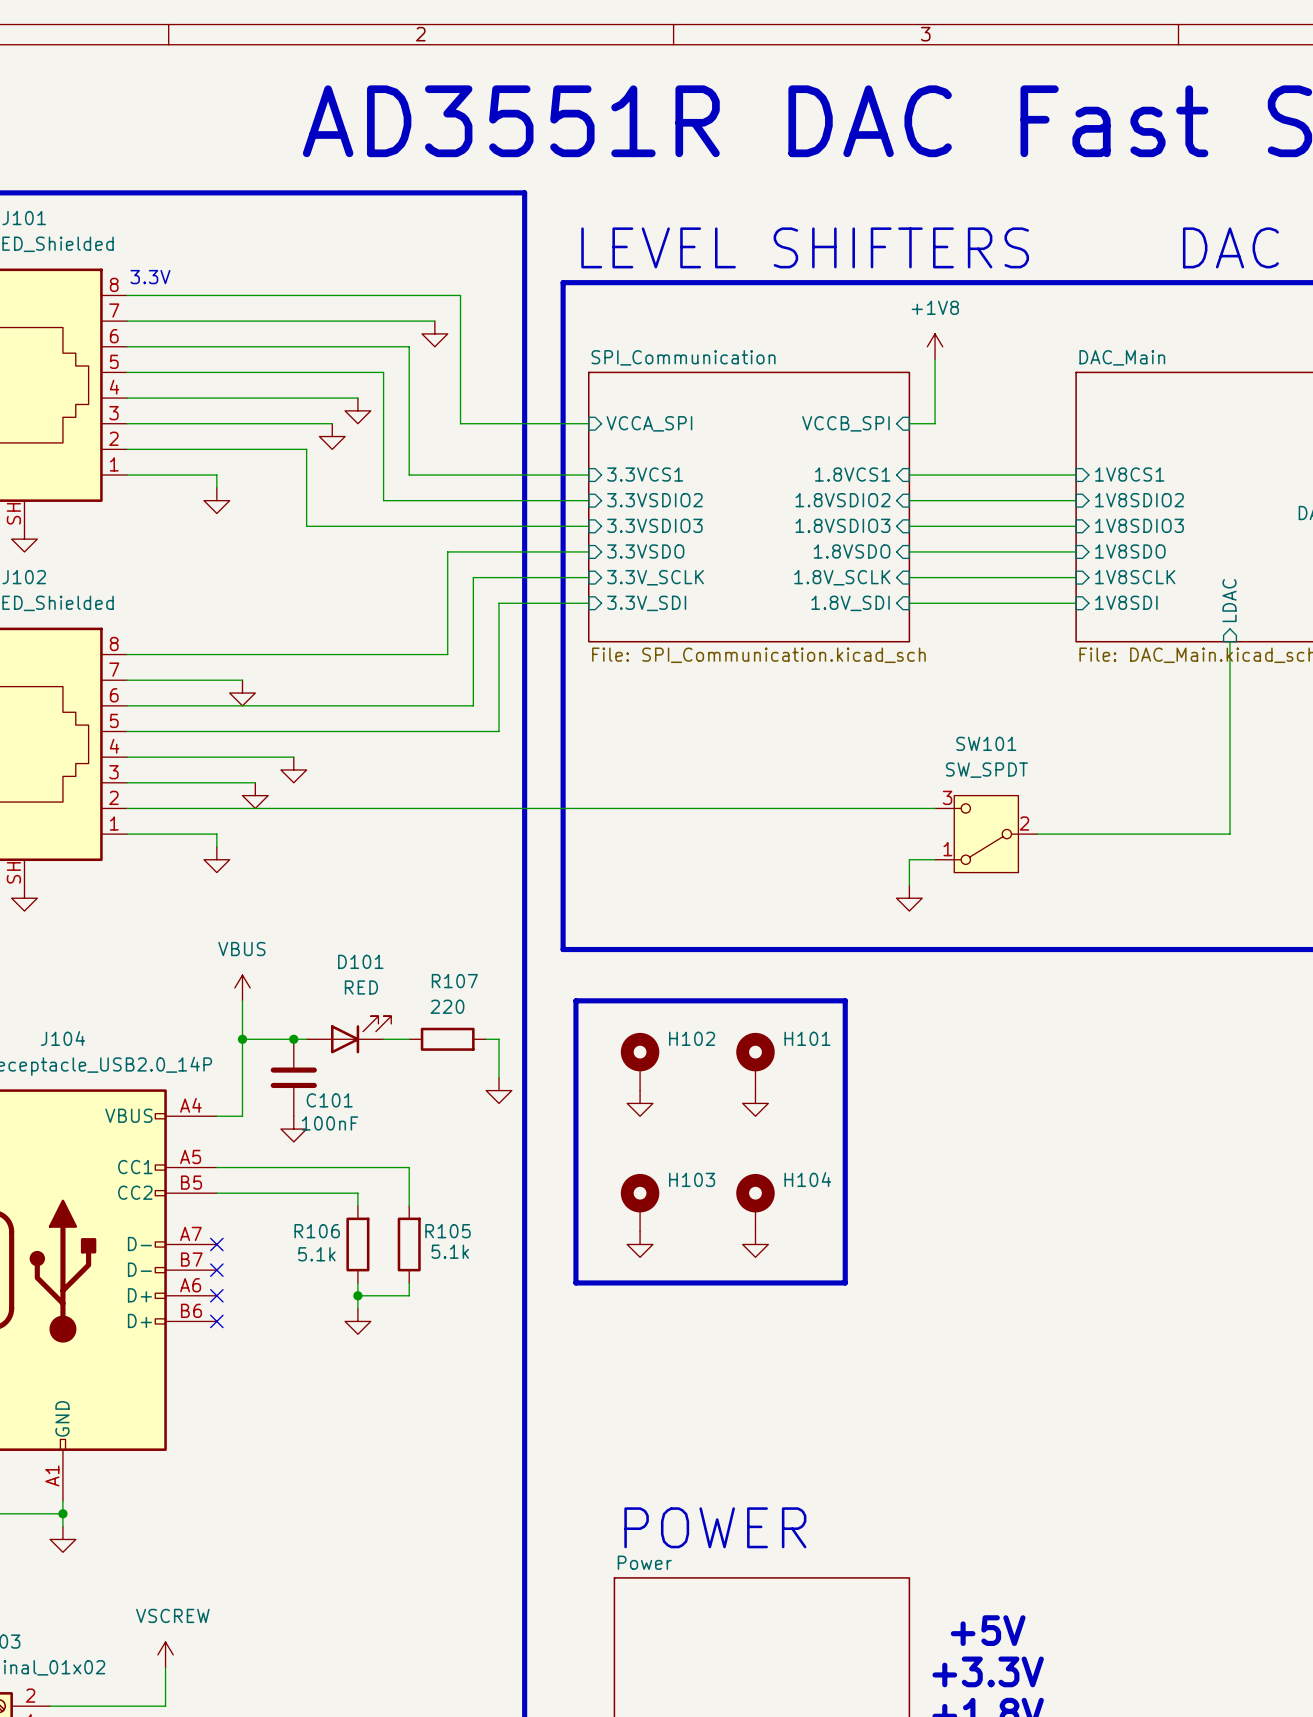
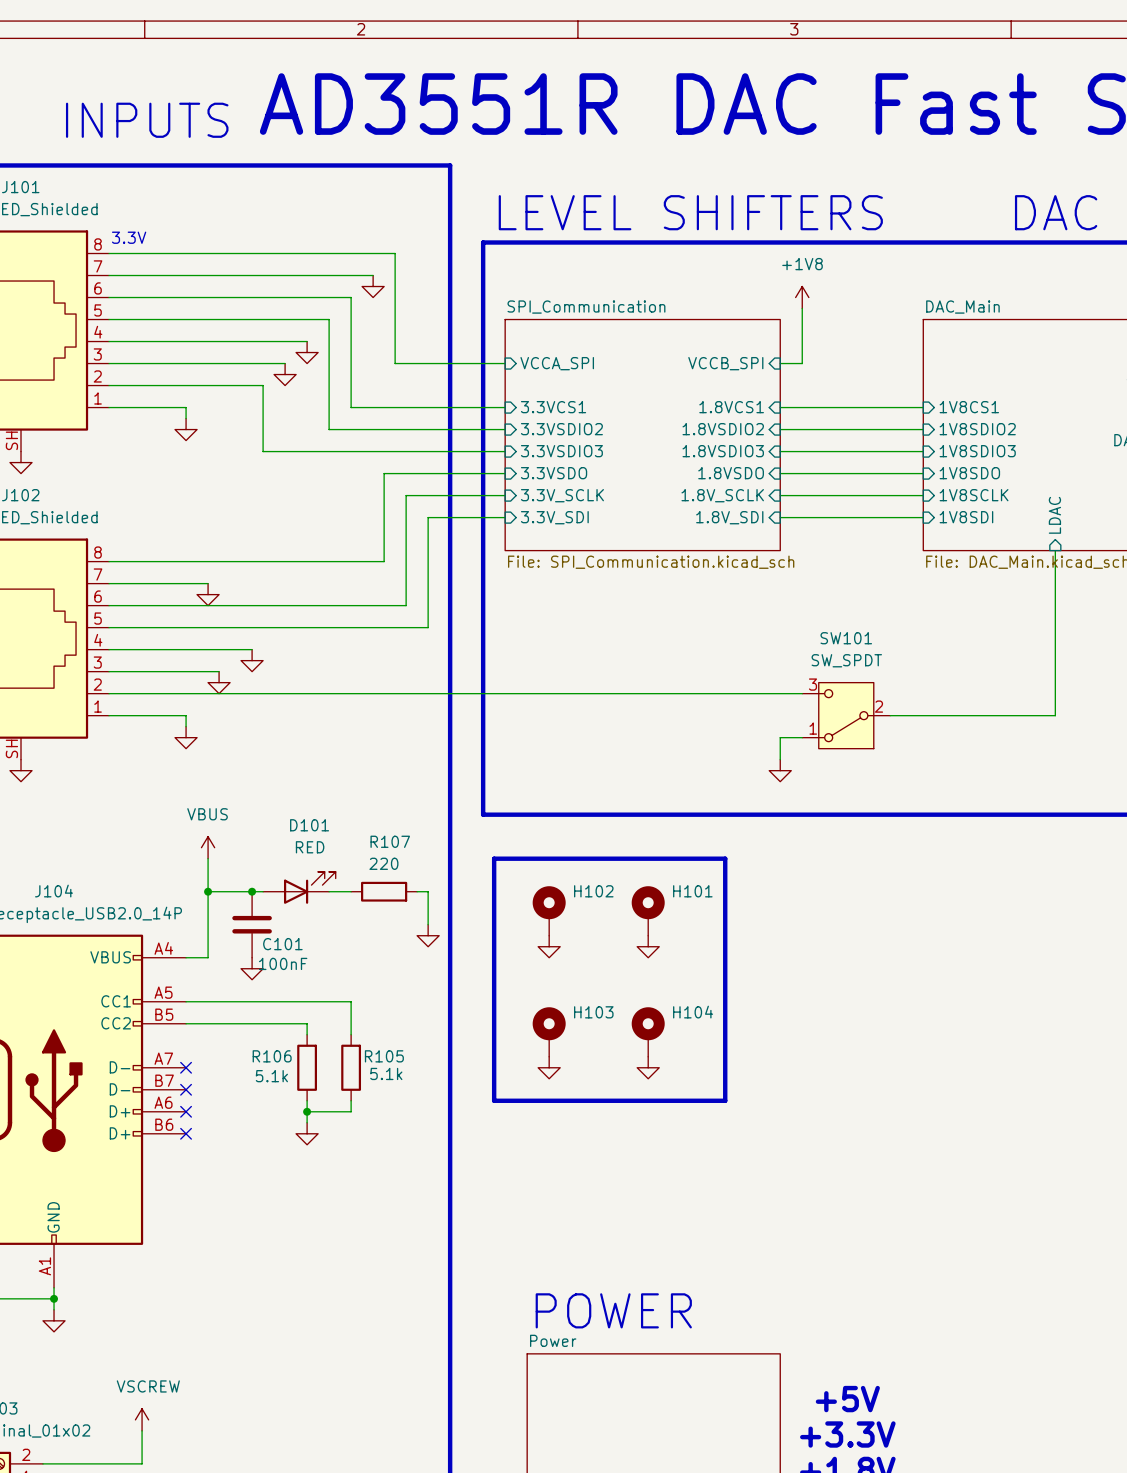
text: none -> INPUTS (147, 120)

